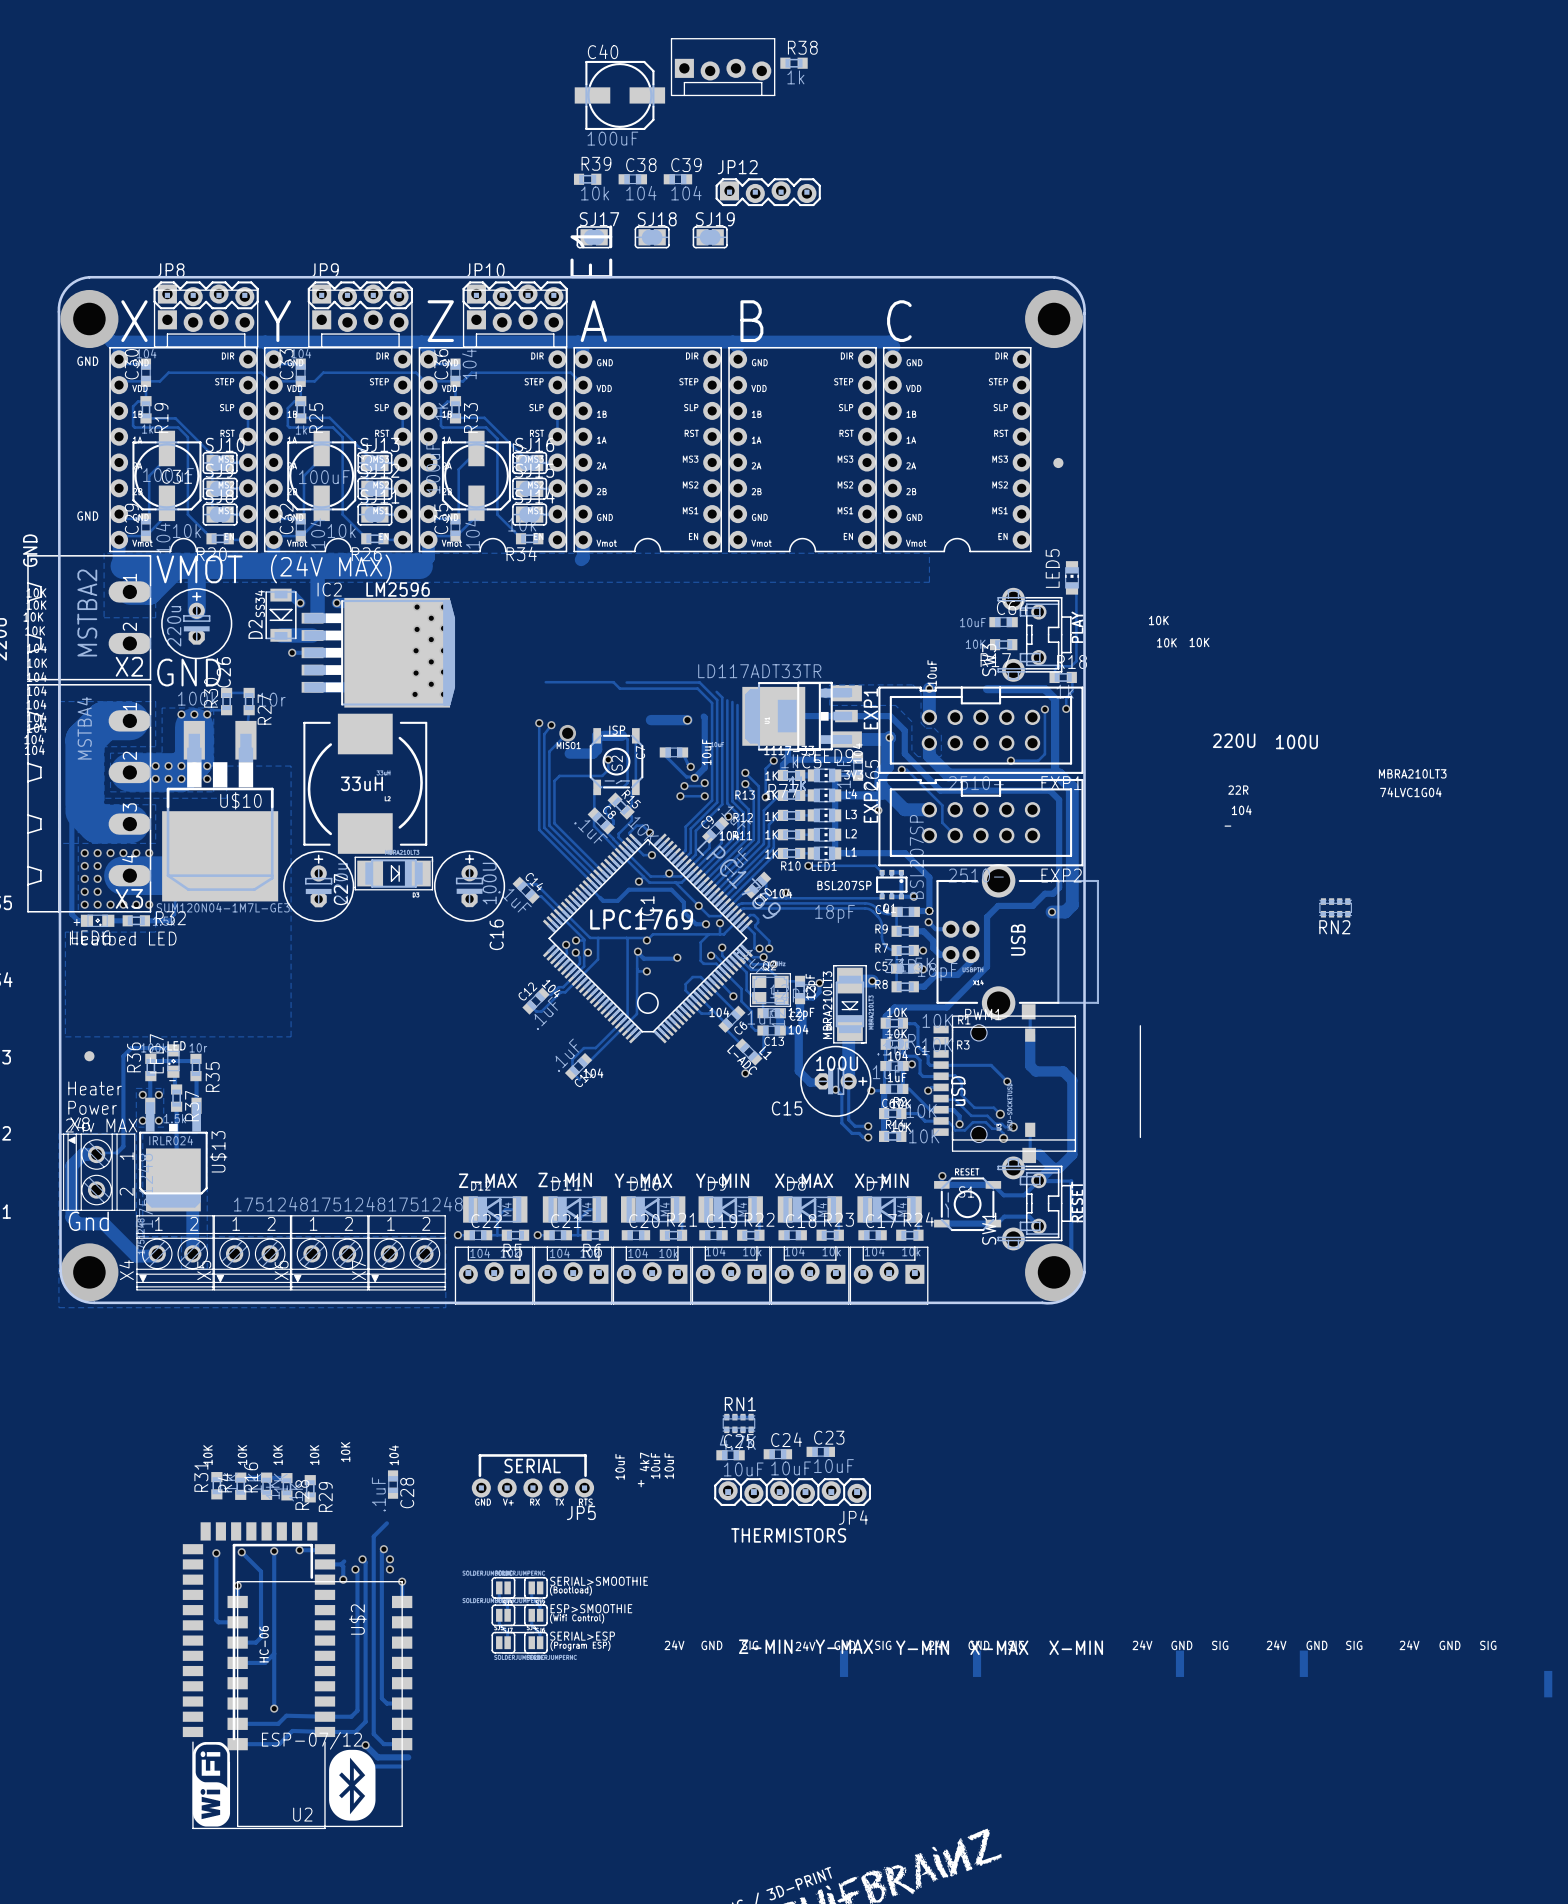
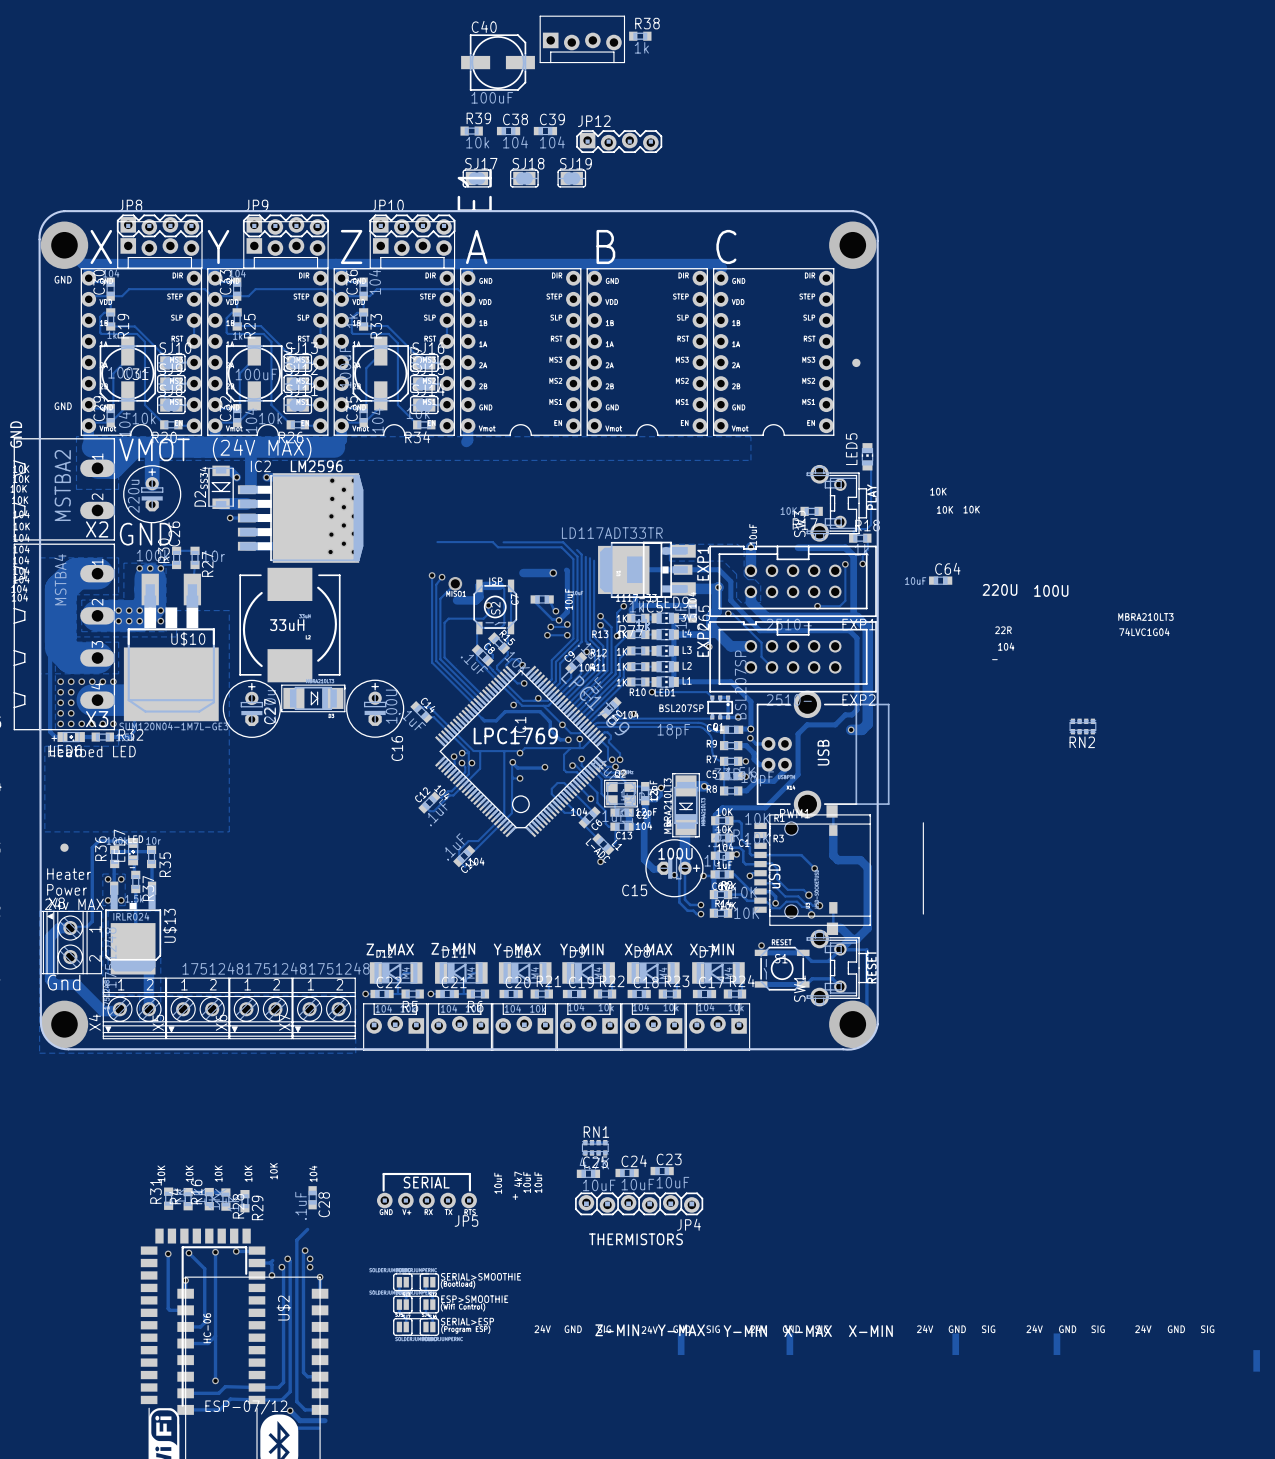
C64 position: (1003, 622) -> (940, 580)

